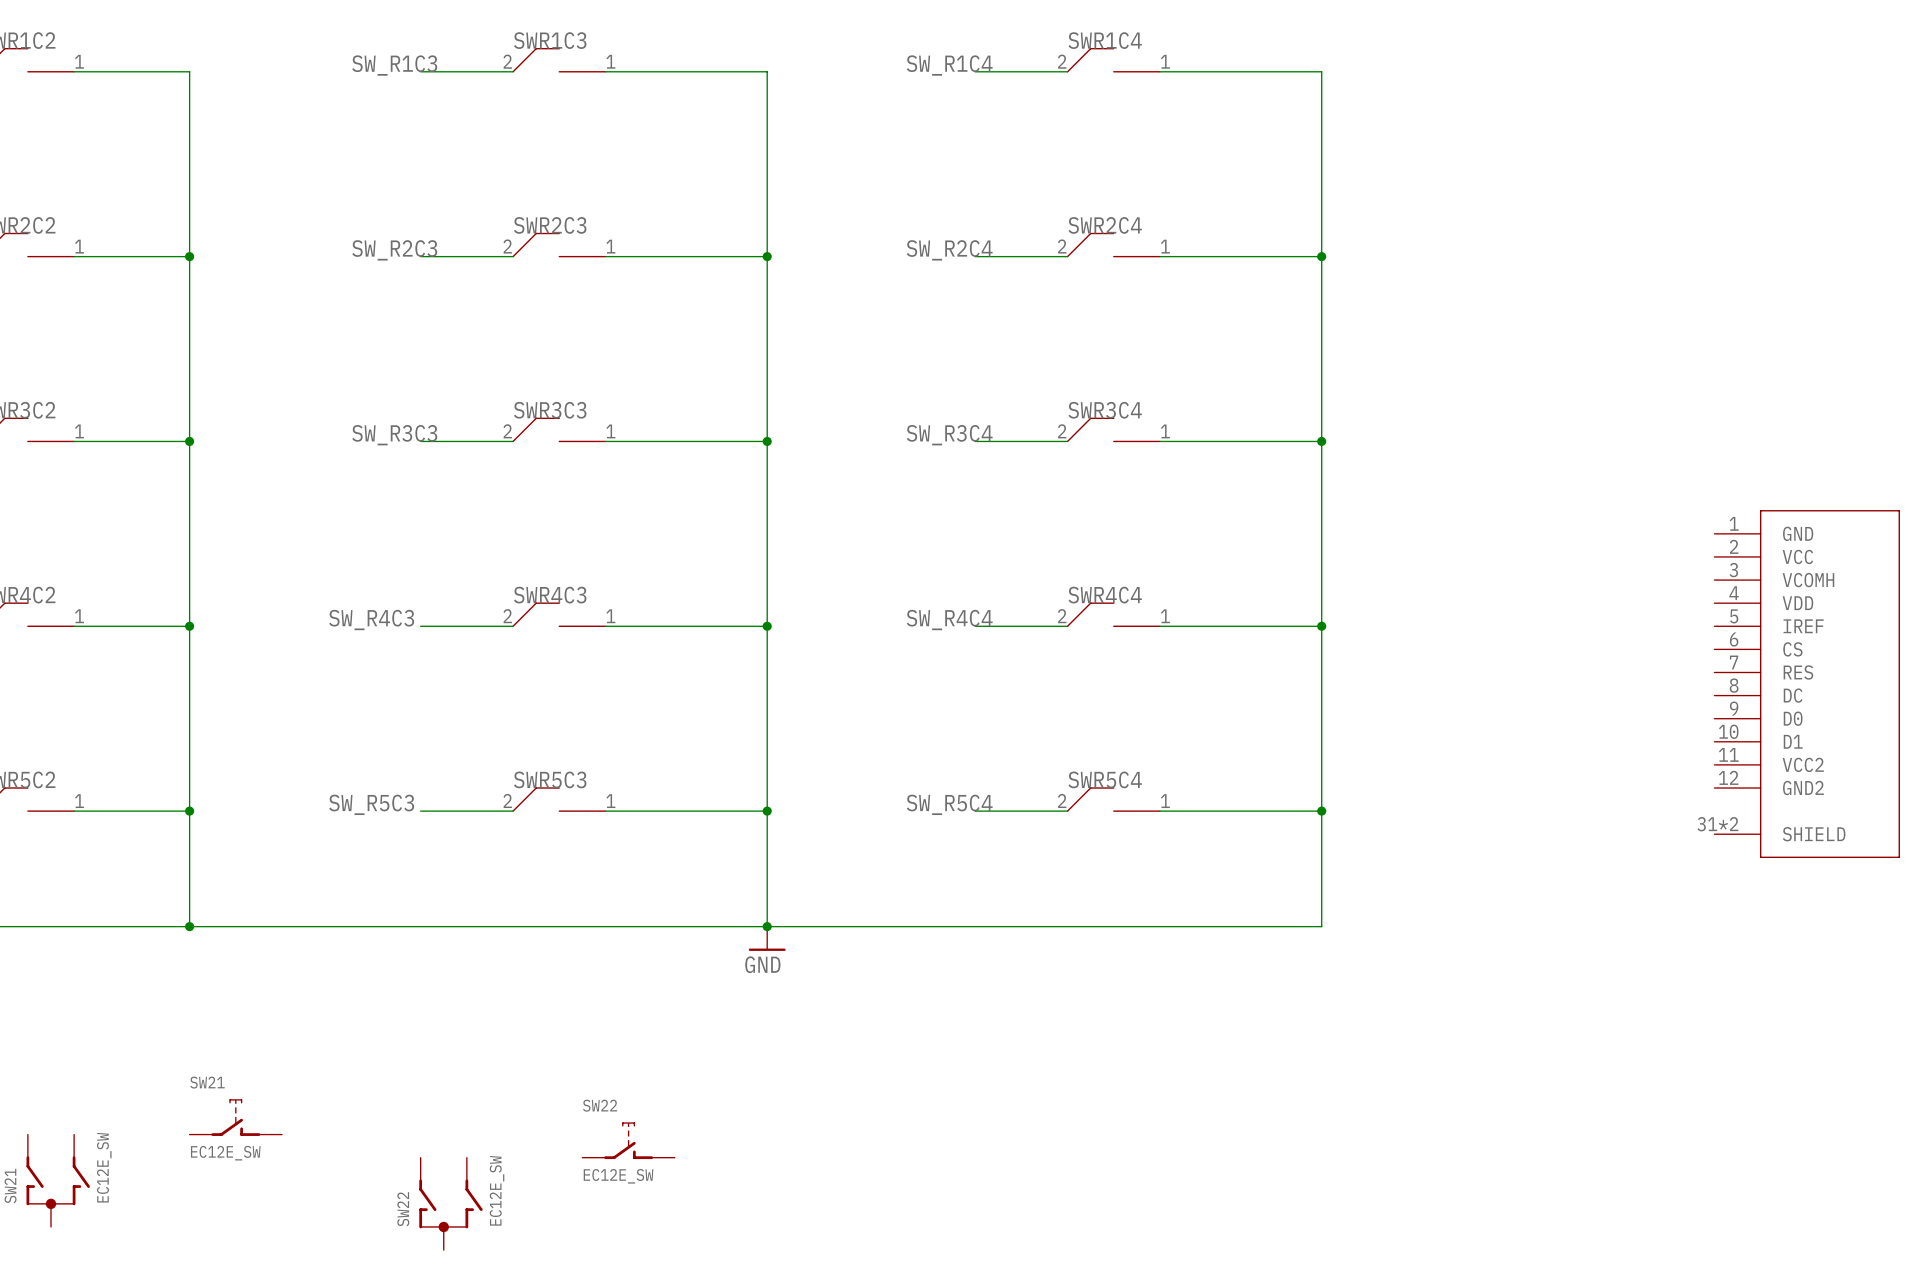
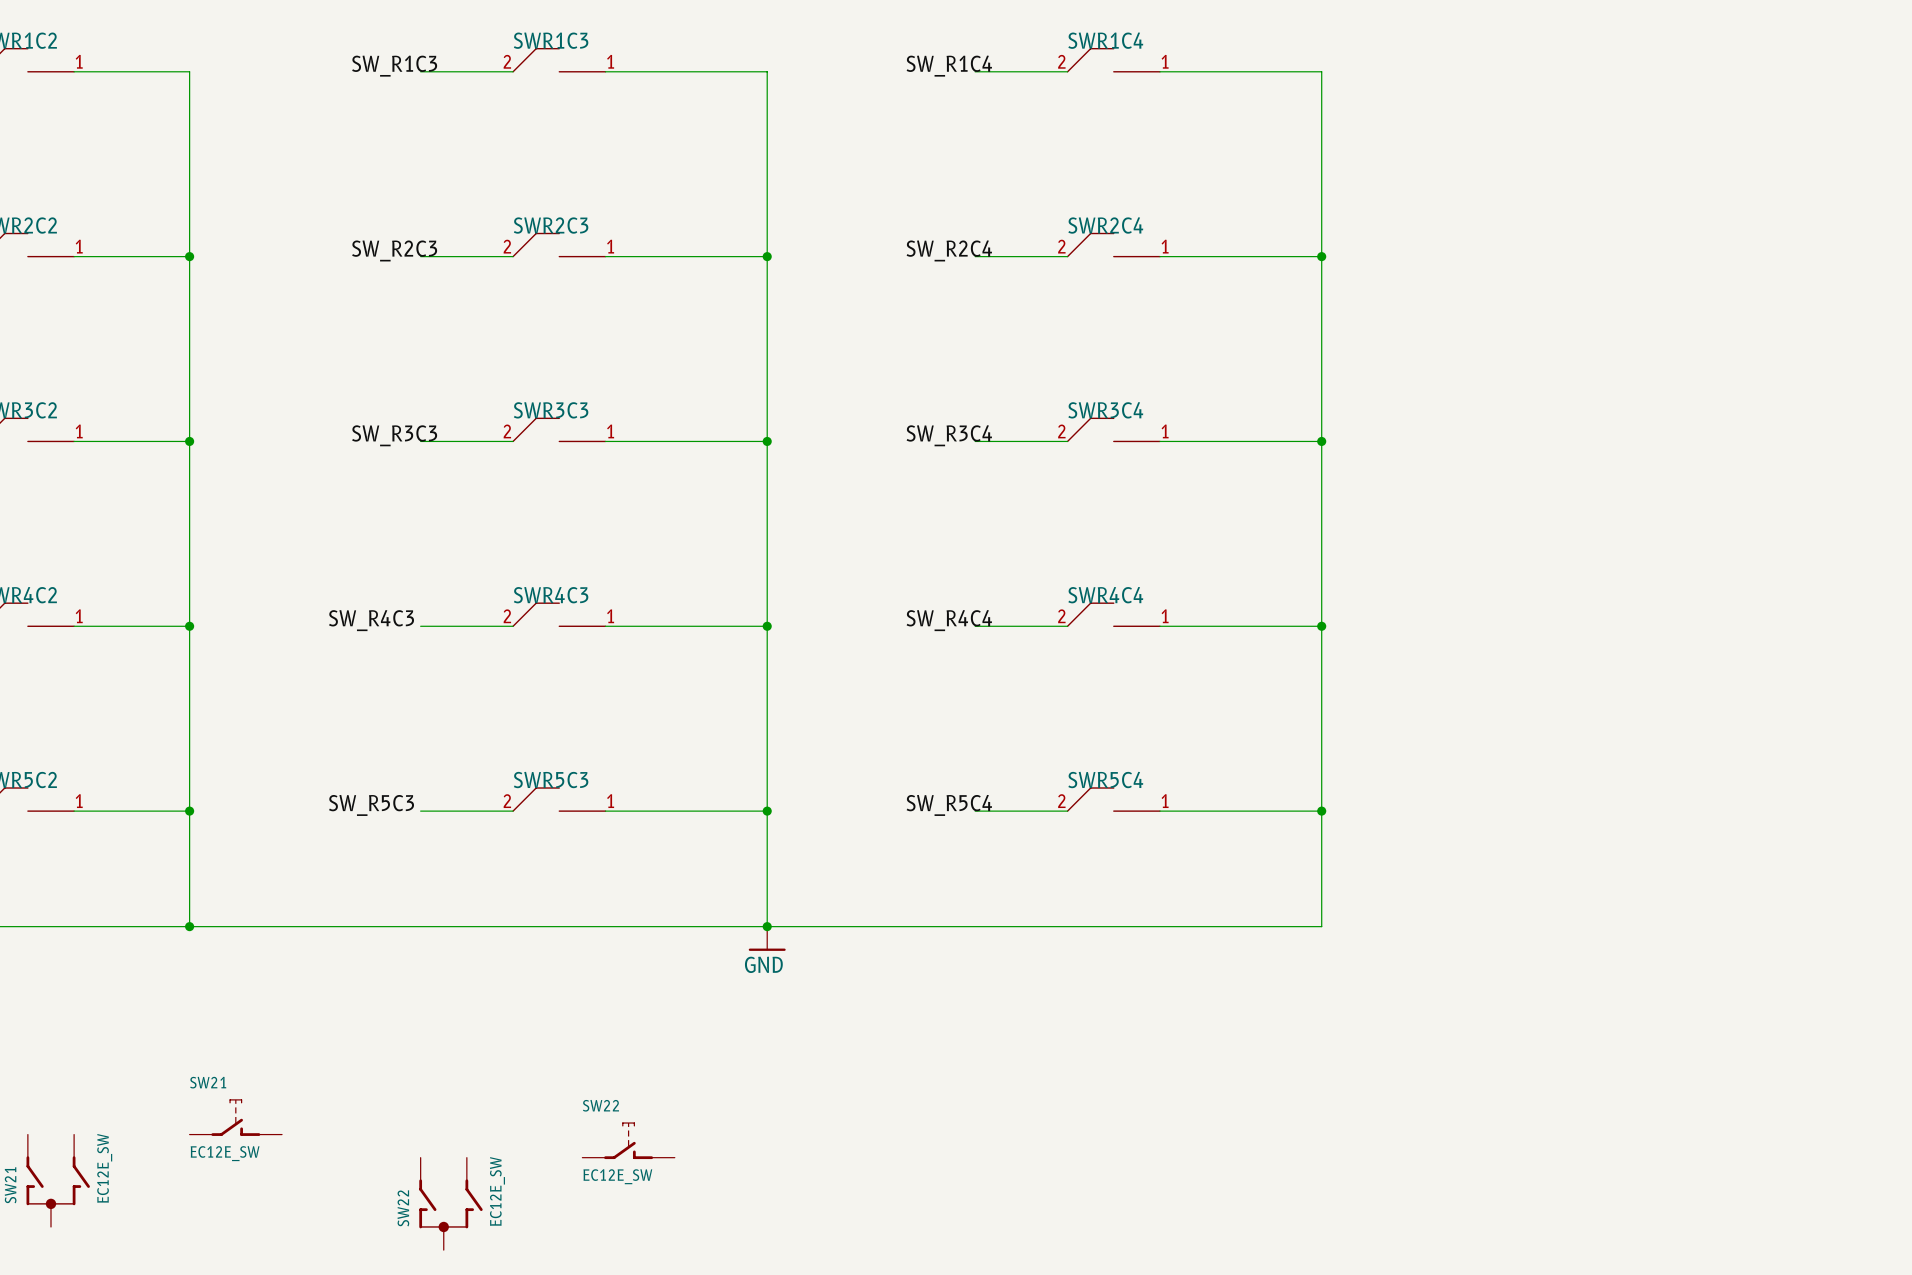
part: (1807, 684) -> none

